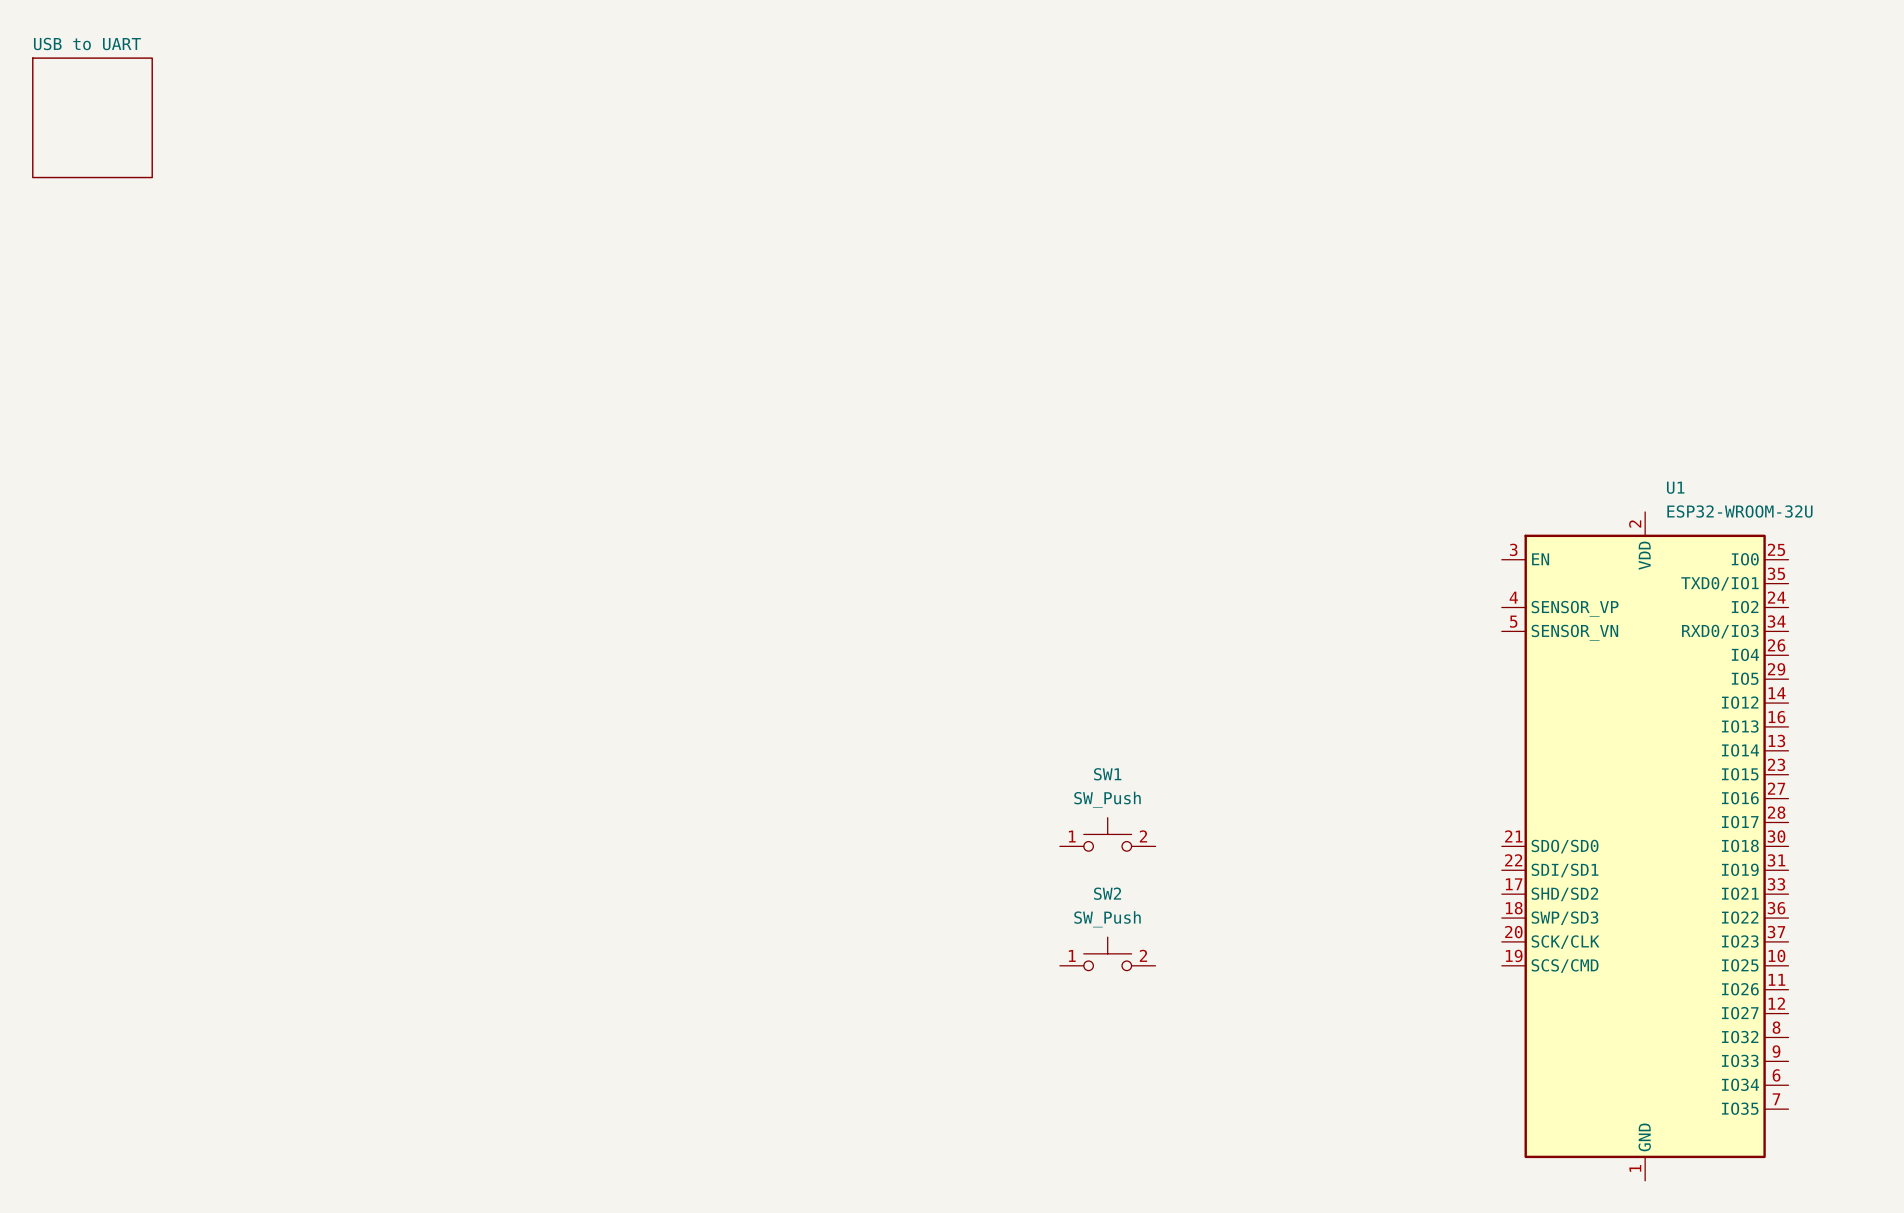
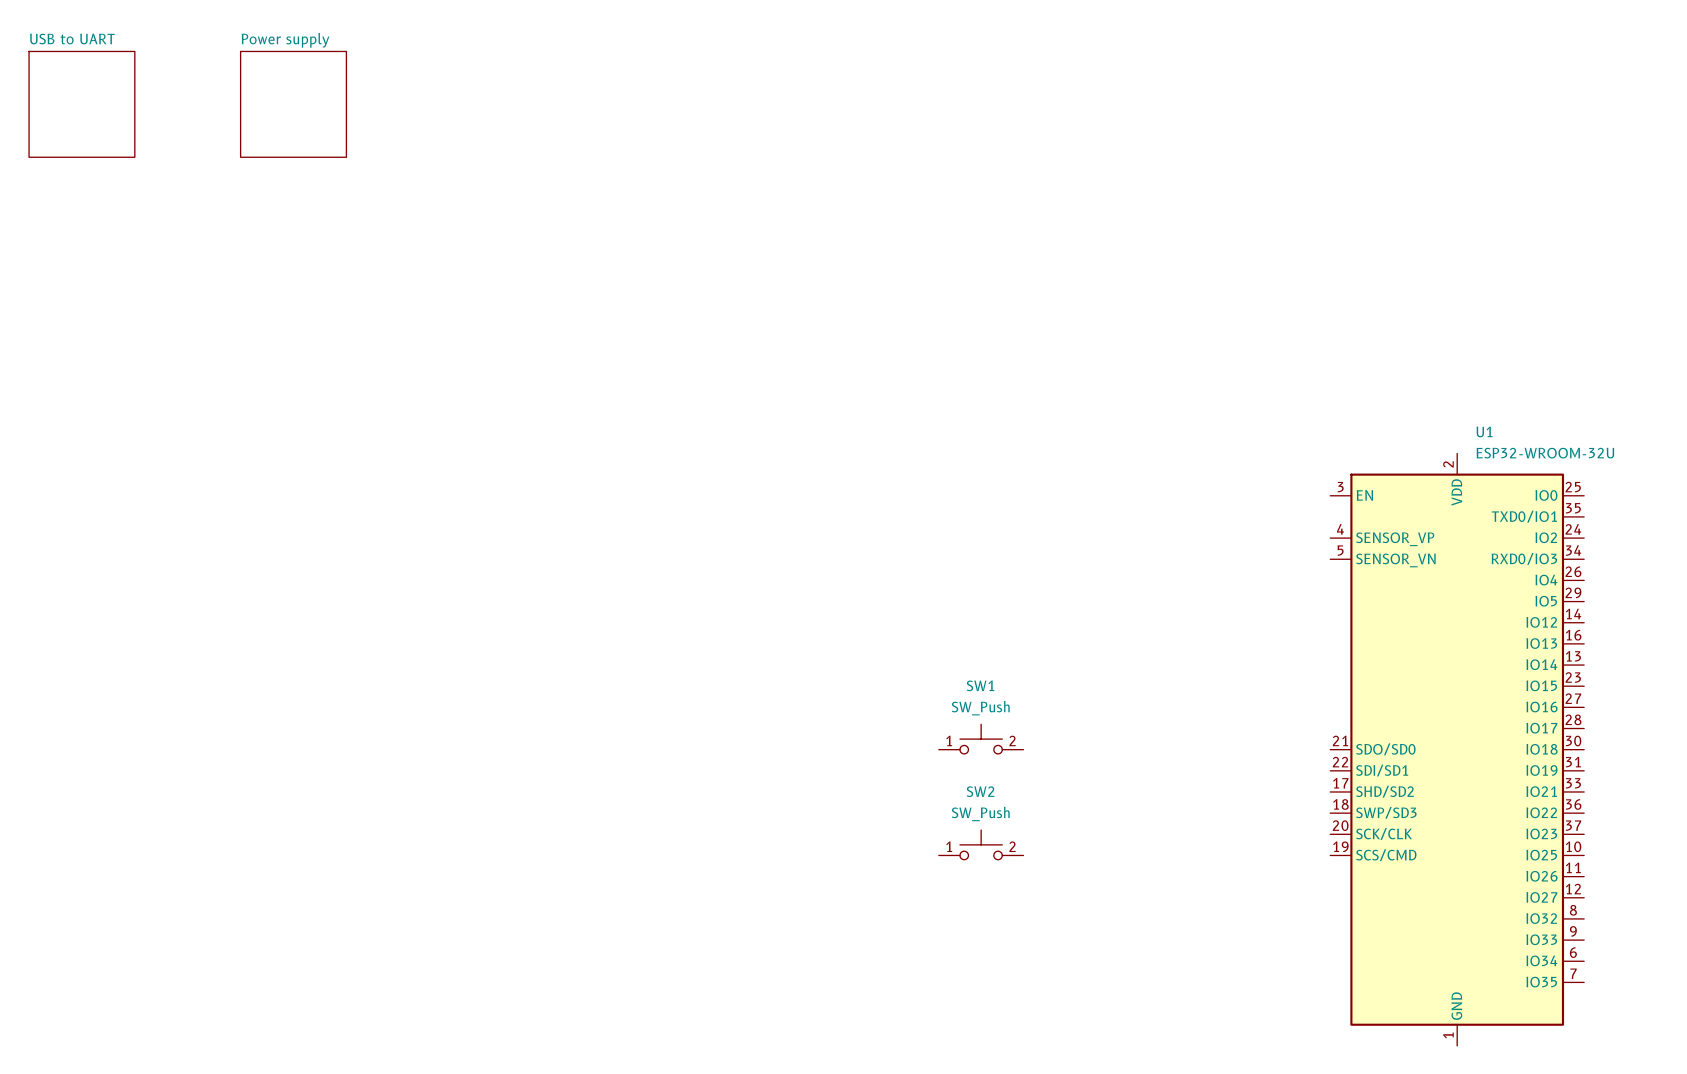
sheet Power supply: none -> (293, 104)

